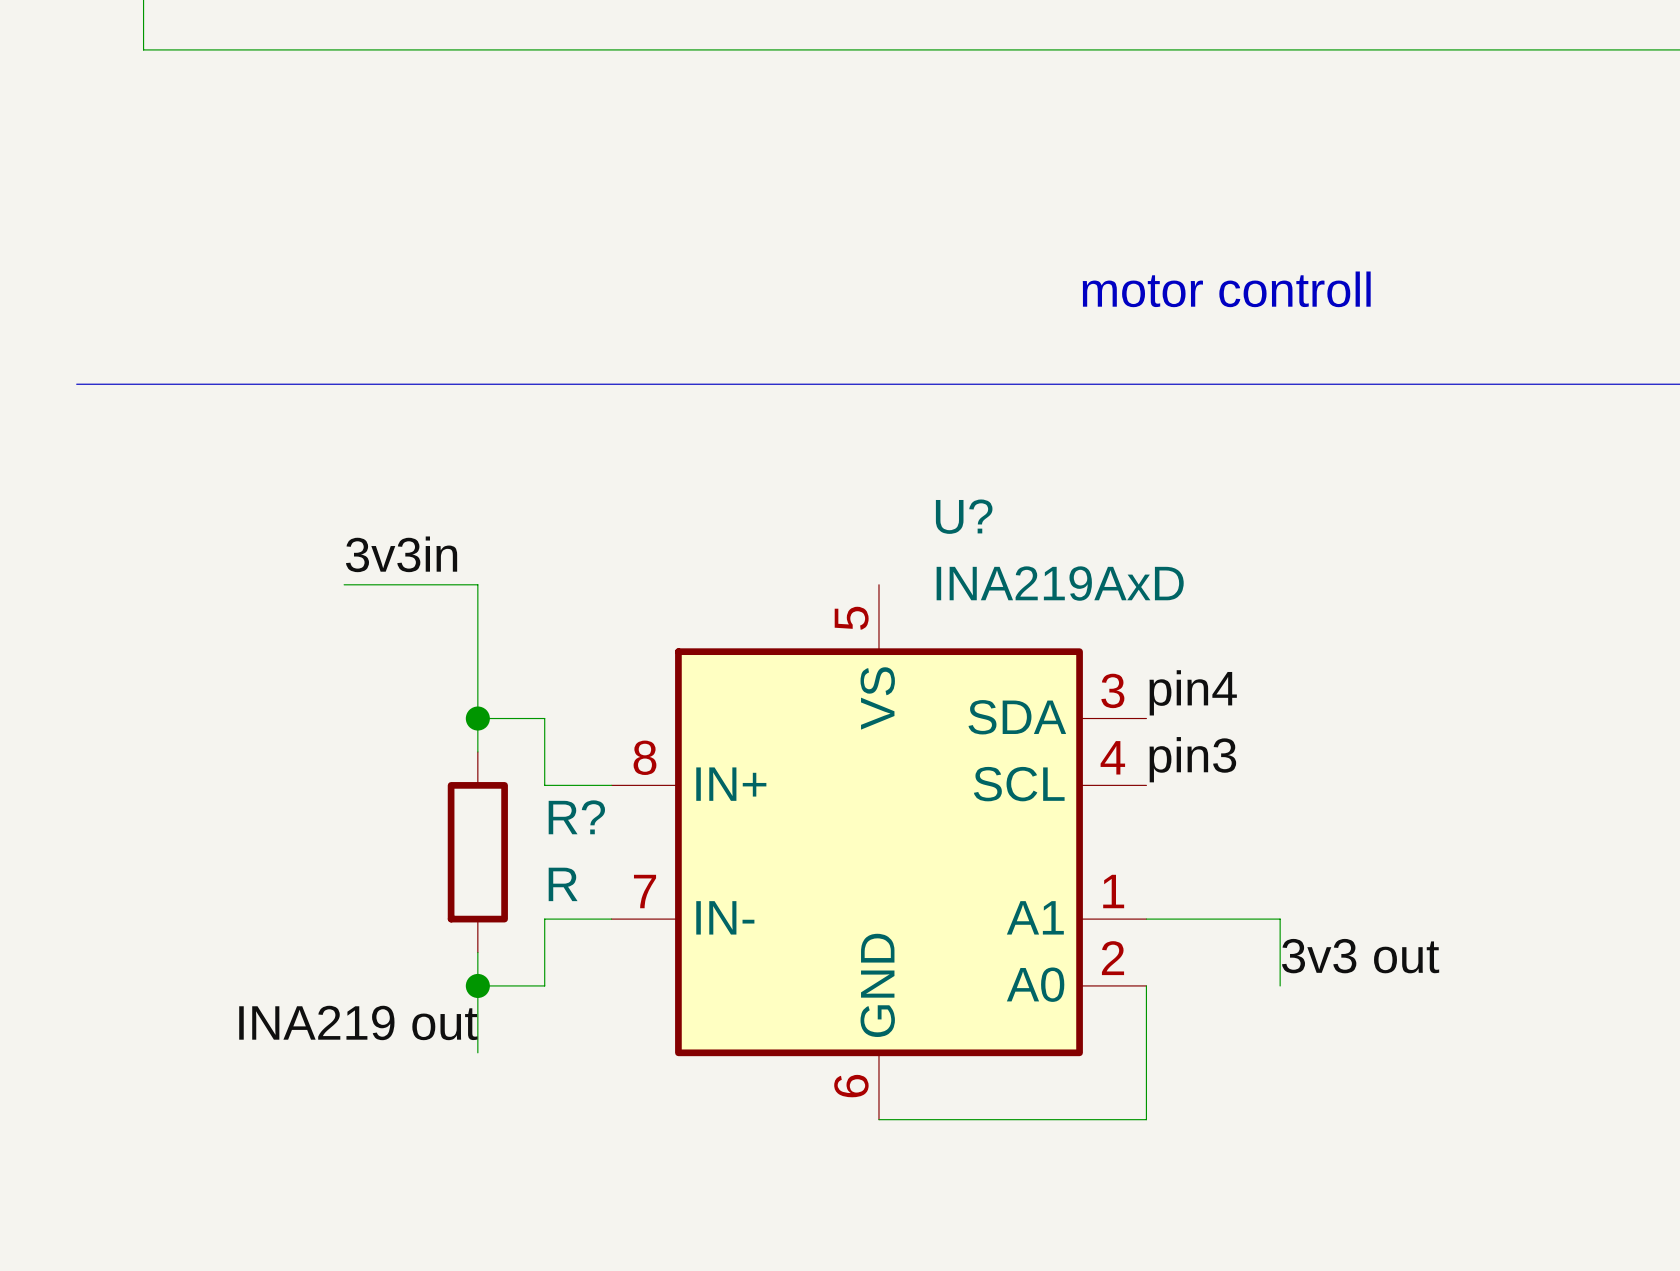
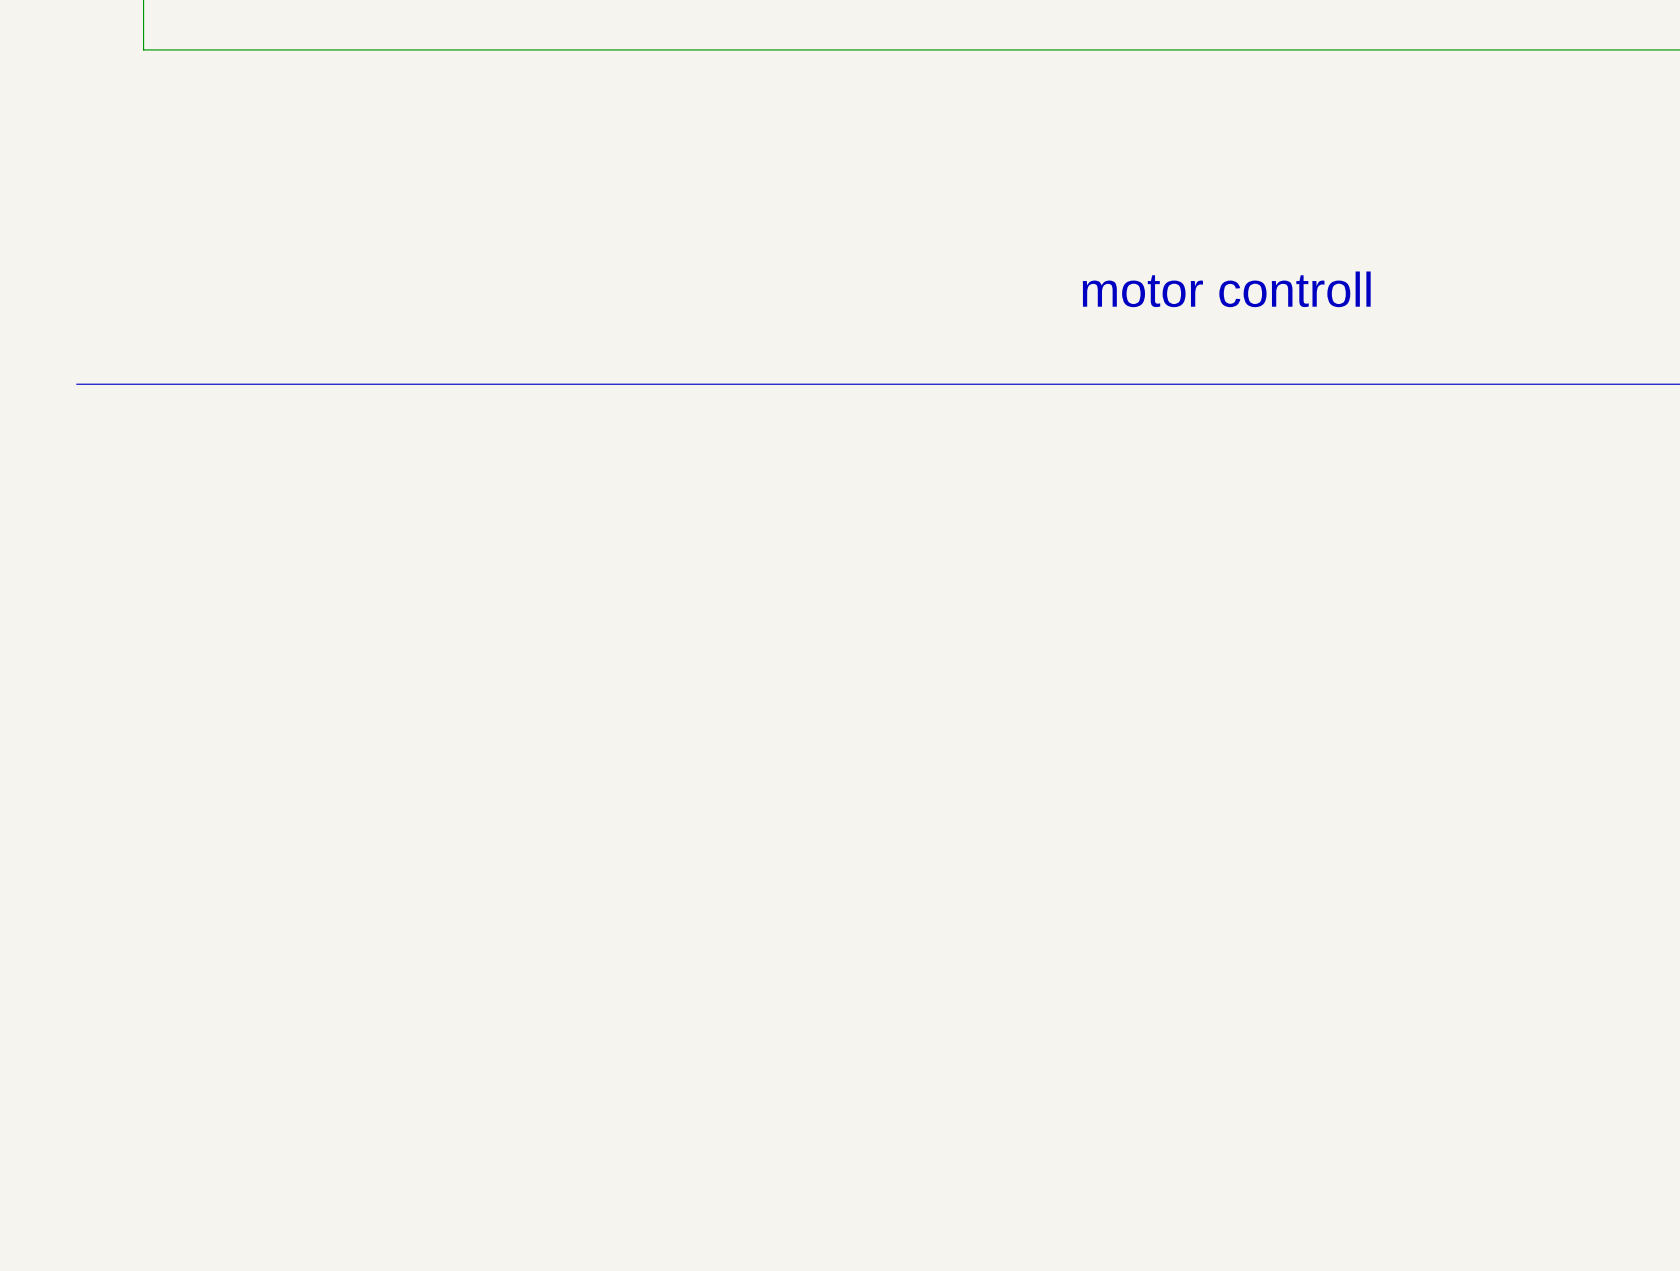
label: 3v3in (401, 554) -> none
wire: (344, 584) (477, 584) (477, 751) -> none
label: pin4 (1193, 692) -> none
wire: (477, 718) (544, 718) (544, 785) (611, 785) -> none
junction: (477, 718) -> none
label: pin3 (1192, 759) -> none
R?: R (477, 852) -> none
U?: INA219AxD (878, 852) -> none
wire: (611, 919) (544, 919) (544, 985) (477, 985) -> none
wire: (1146, 919) (1280, 919) (1280, 985) -> none
wire: (477, 952) (477, 1052) -> none
label: 3v3 out (1360, 956) -> none
junction: (477, 985) -> none
wire: (1146, 985) (1146, 1119) (878, 1119) -> none
label: INA219 out (358, 1022) -> none

